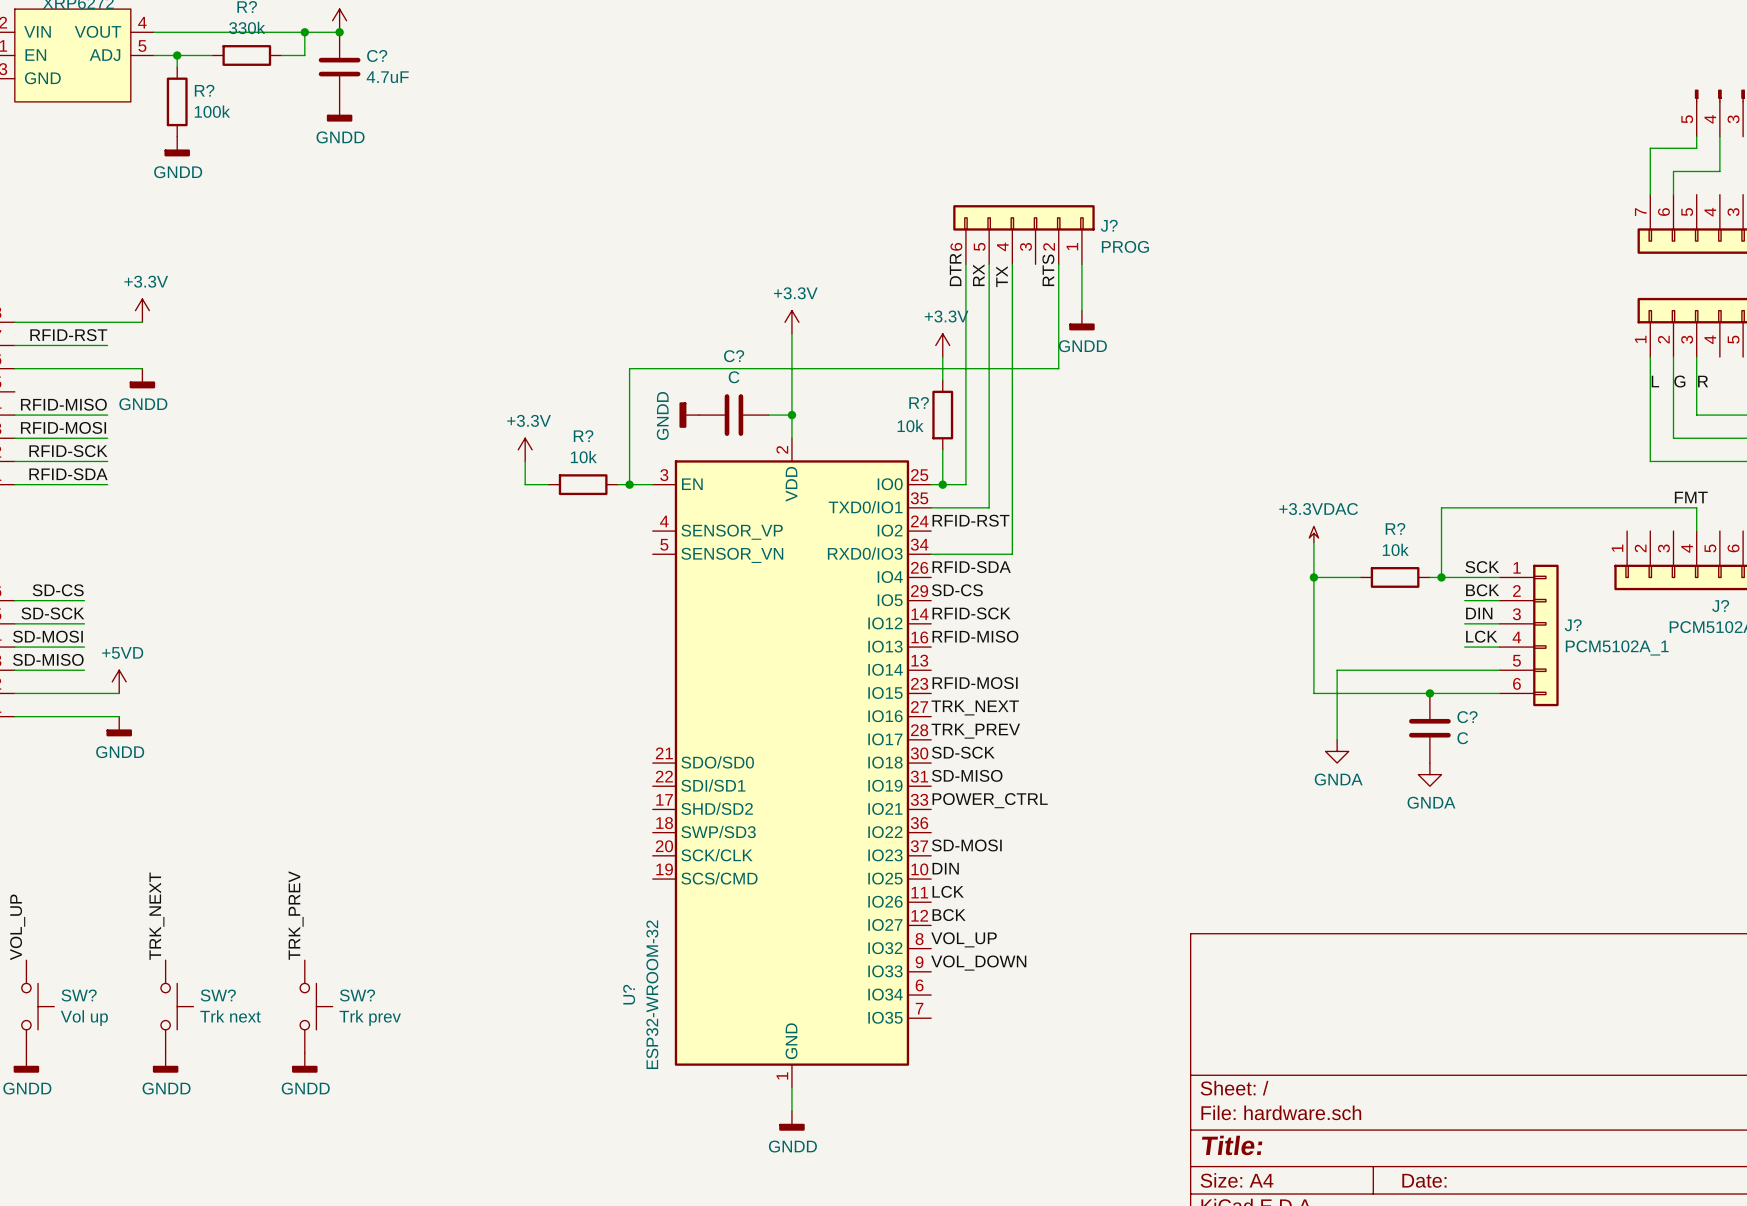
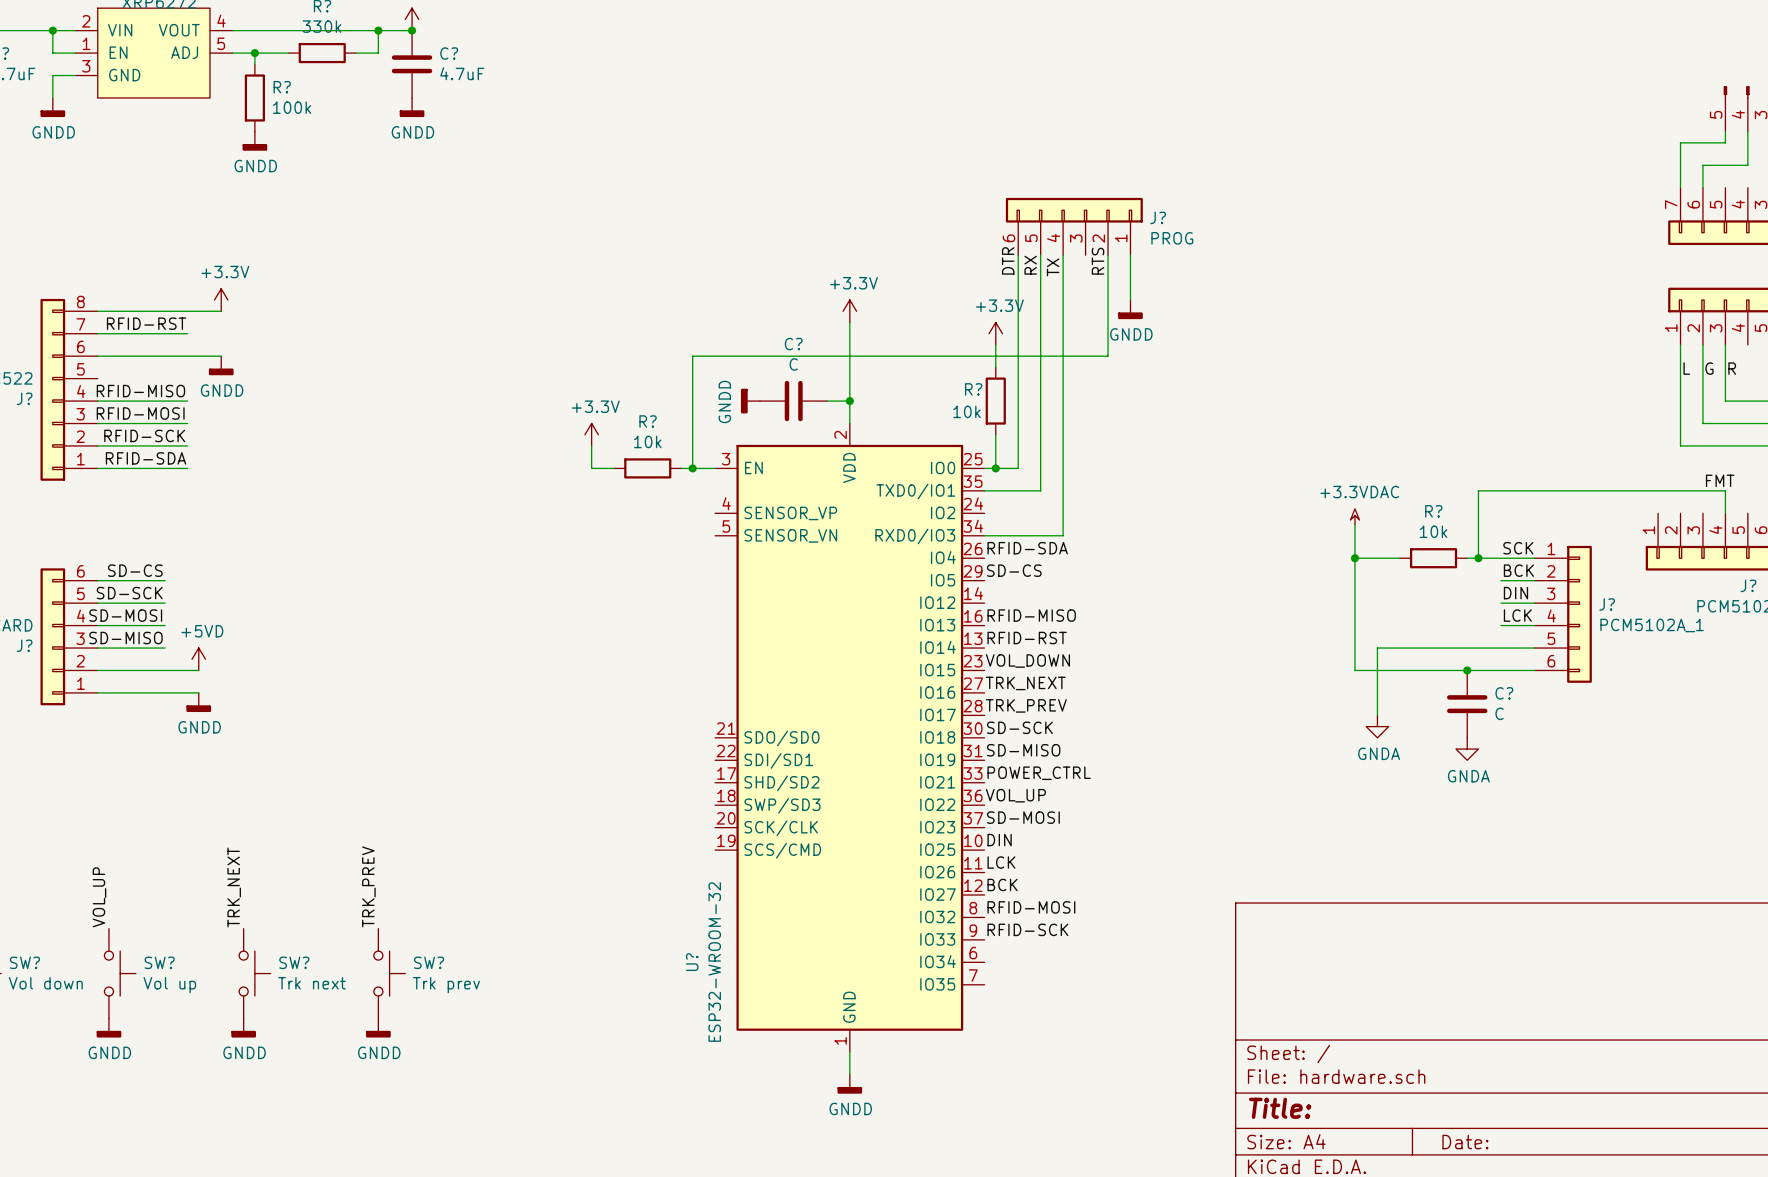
label position: RFID-RST (970, 520) -> RFID-RST (1027, 638)
label: RFID-SCK (971, 613) -> none
label: RFID-MOSI (975, 683) -> VOL_DOWN (1027, 660)
label: none -> VOL_UP (1015, 795)
label: VOL_UP (964, 939) -> RFID-MOSI (1031, 907)
label: VOL_DOWN (978, 963) -> RFID-SCK (1027, 929)

